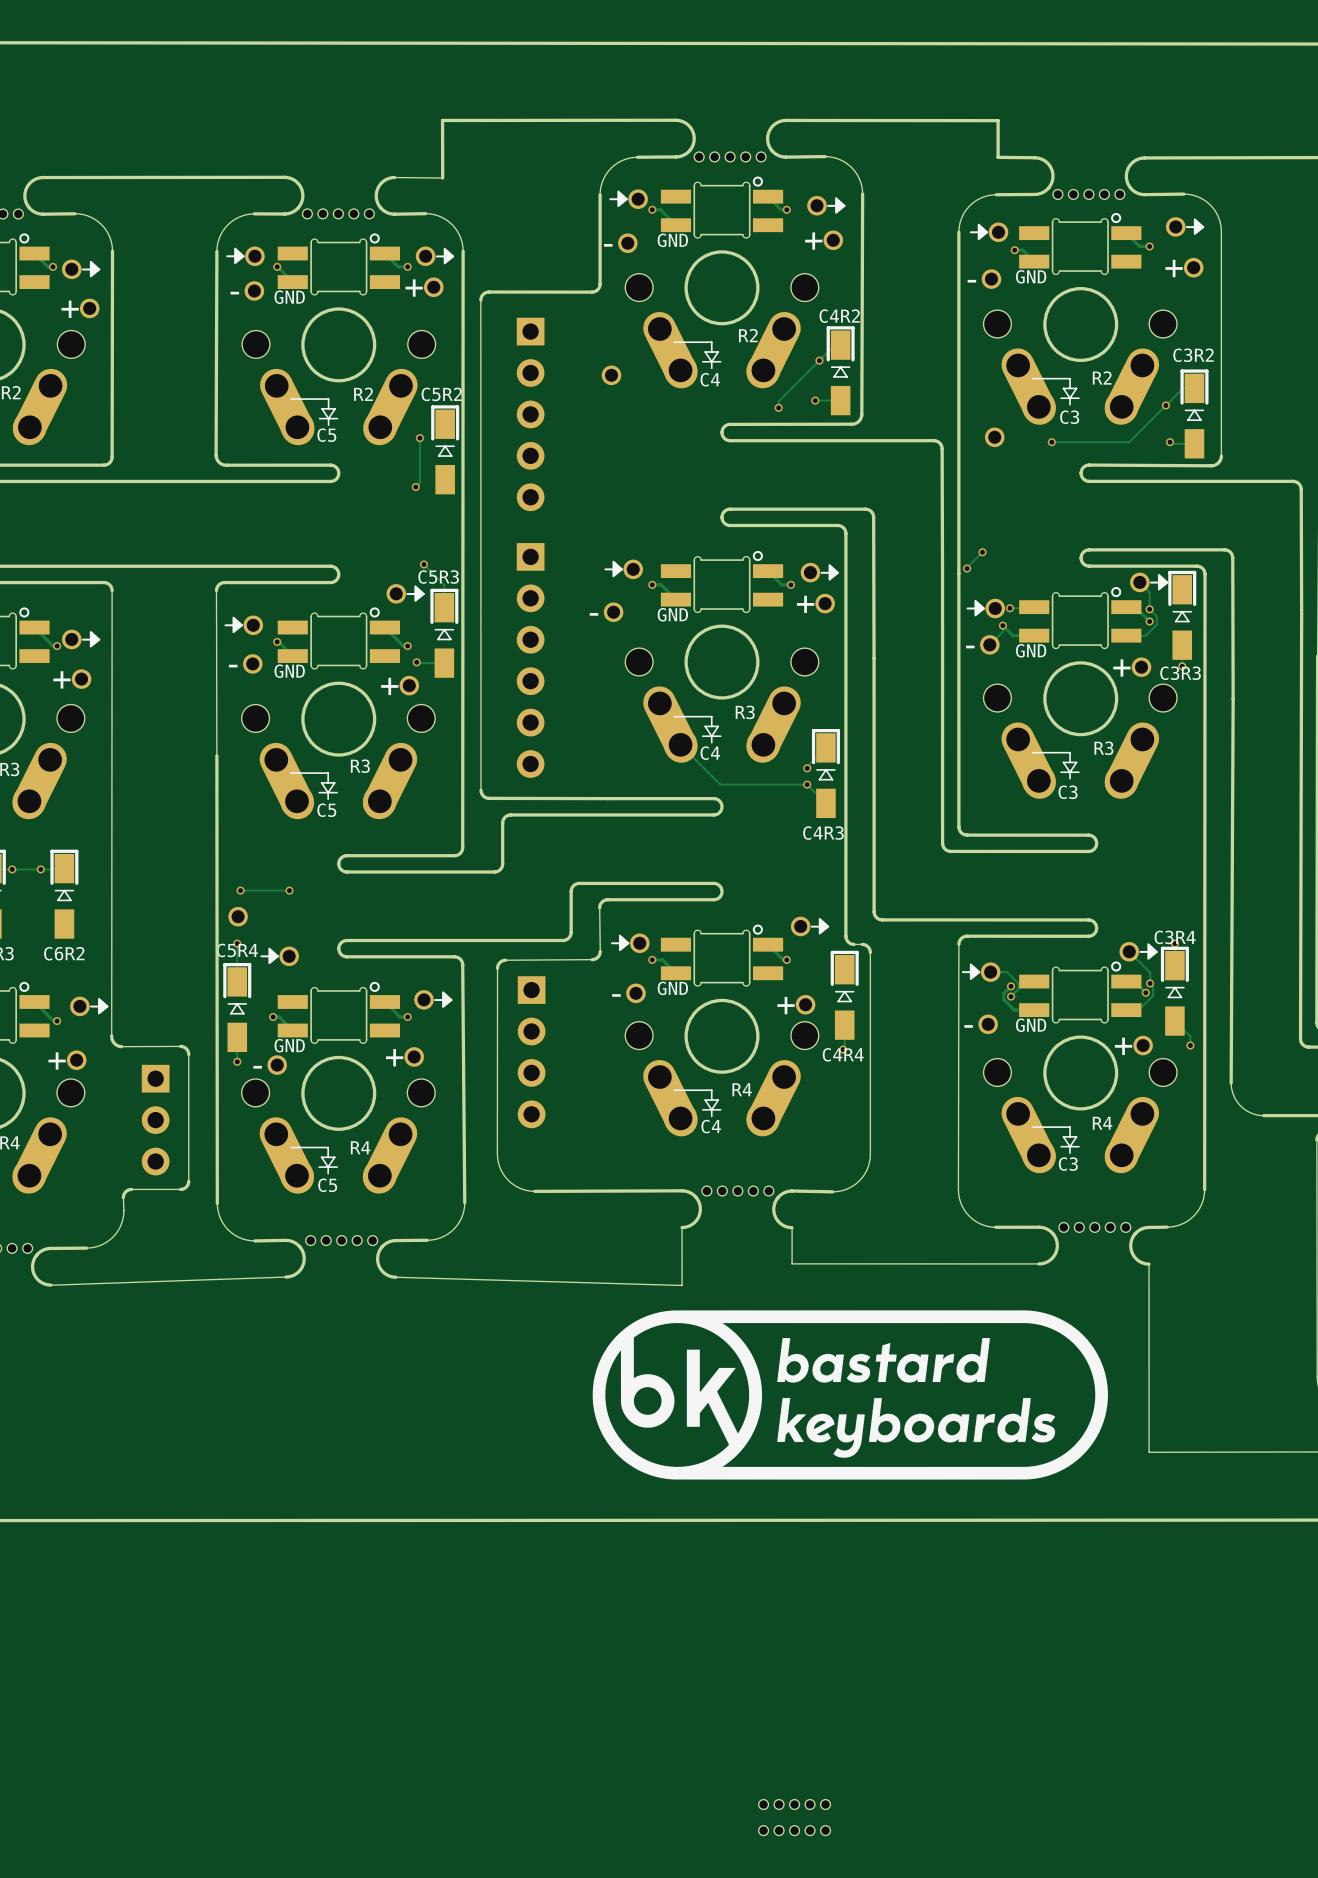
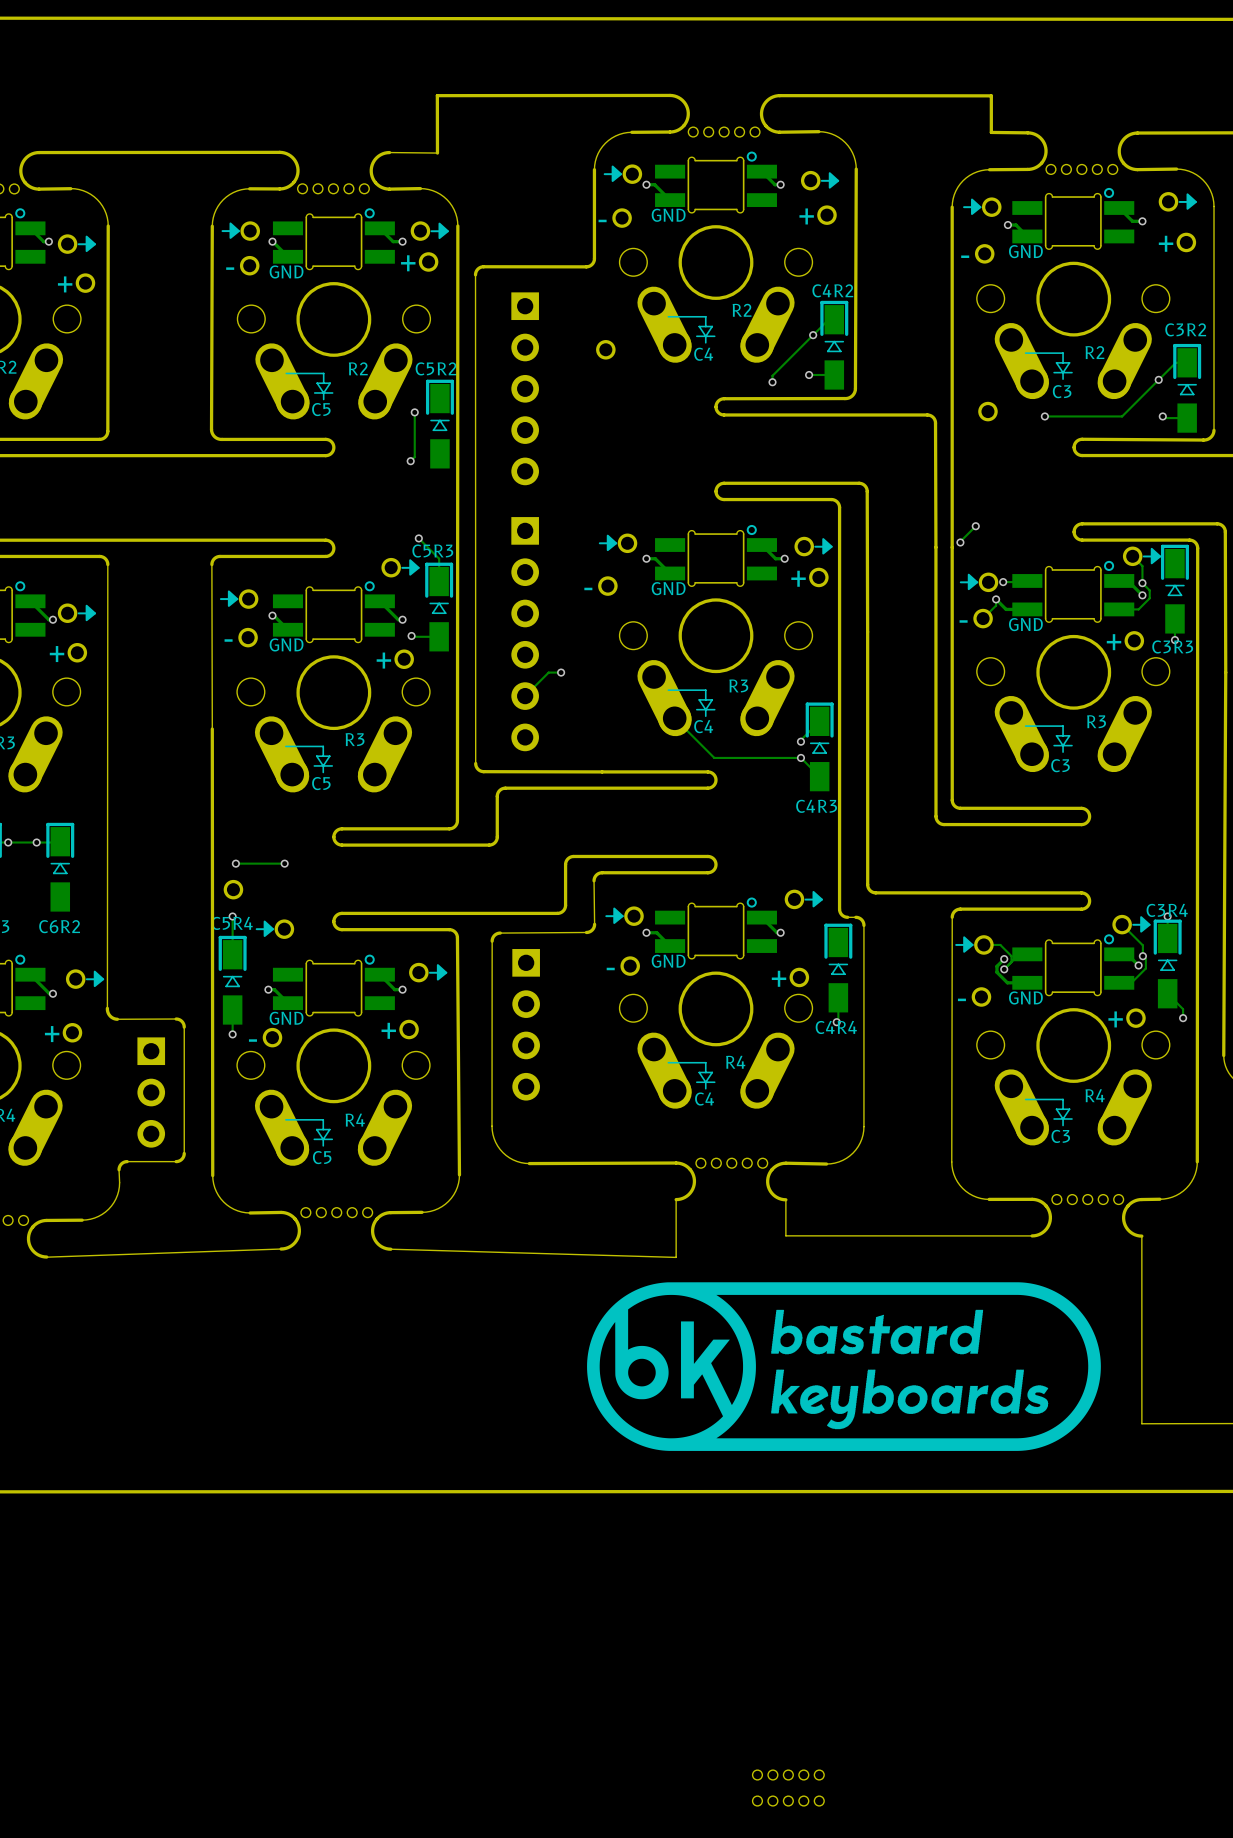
track: none -> (561, 672) (548, 672) (525, 696)
via: none -> (561, 672)

